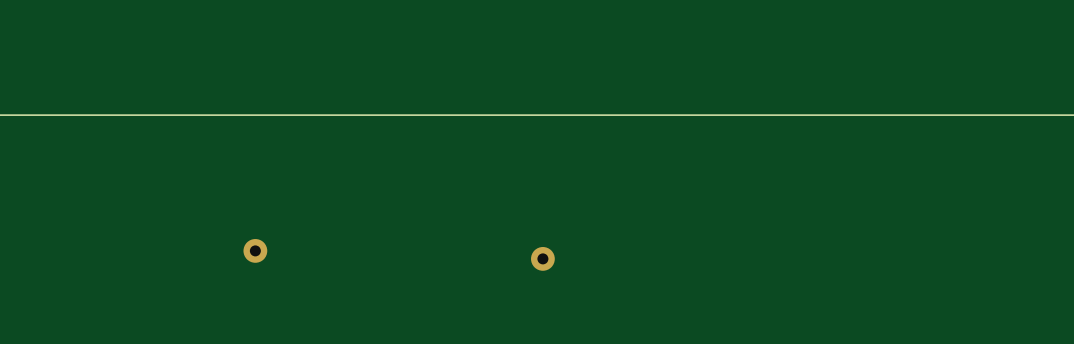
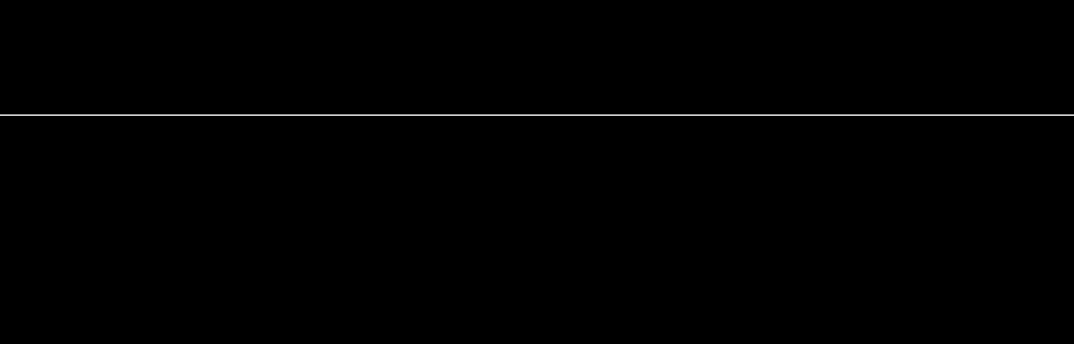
via: (255, 250) -> none
via: (542, 258) -> none

